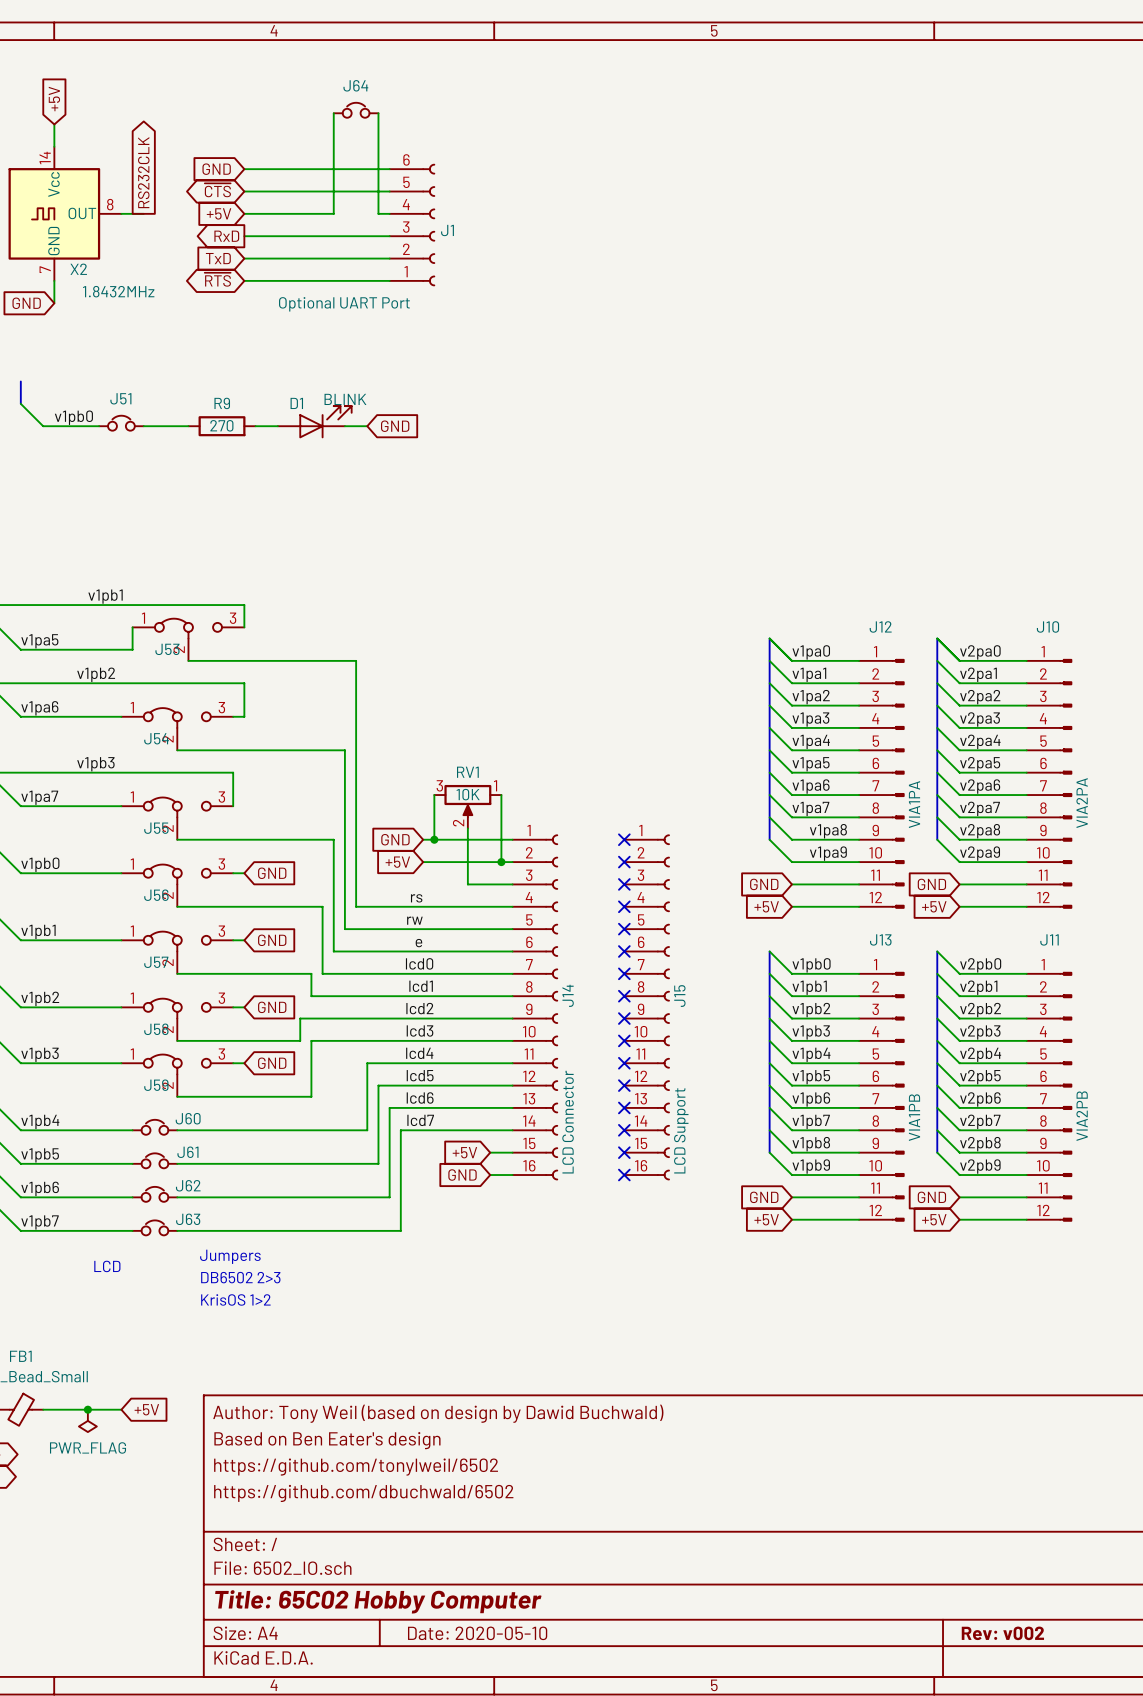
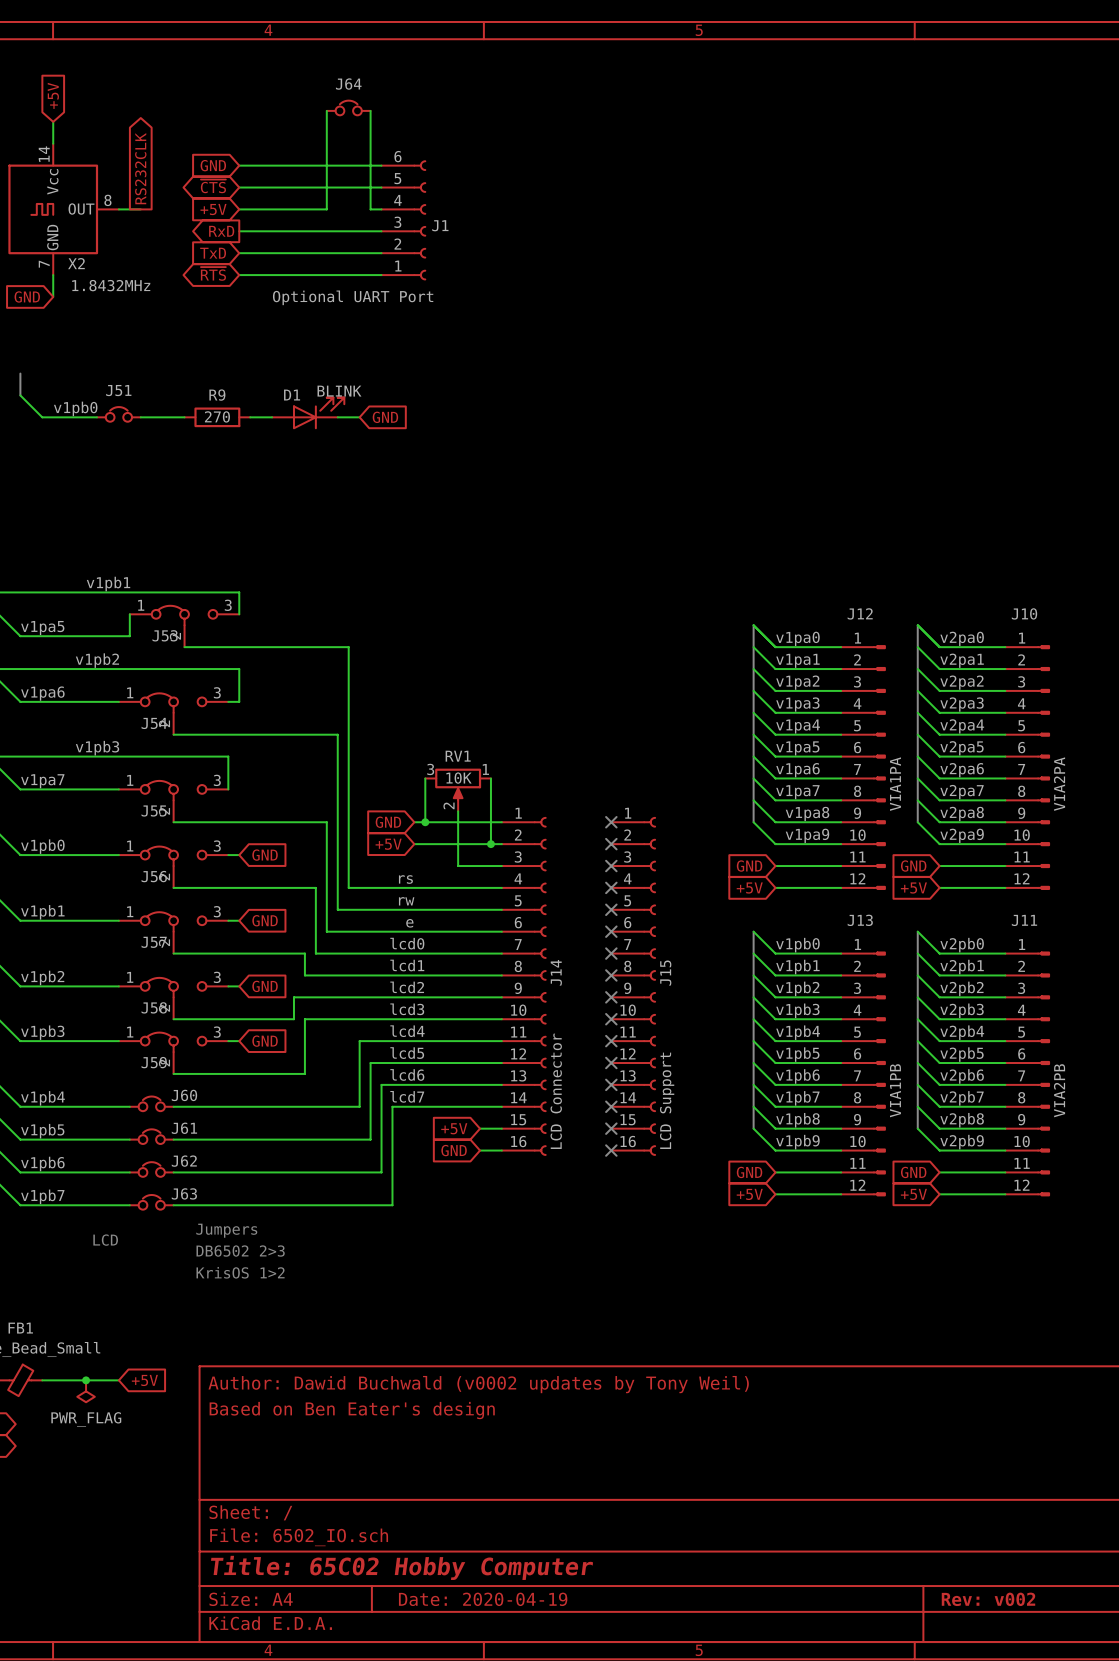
title block: Author: Tony Weil (based on design by Dawid Buchwald) (438, 1413) -> Author: Dawid Buchwald (v0002 updates by Tony Weil) (478, 1384)
title block: https://github.com/tonylweil/6502 (356, 1467) -> none
title block: https://github.com/dbuchwald/6502 (363, 1493) -> none
title block: Date: 2020-05-10 (477, 1633) -> Date: 2020-04-19 (483, 1599)

